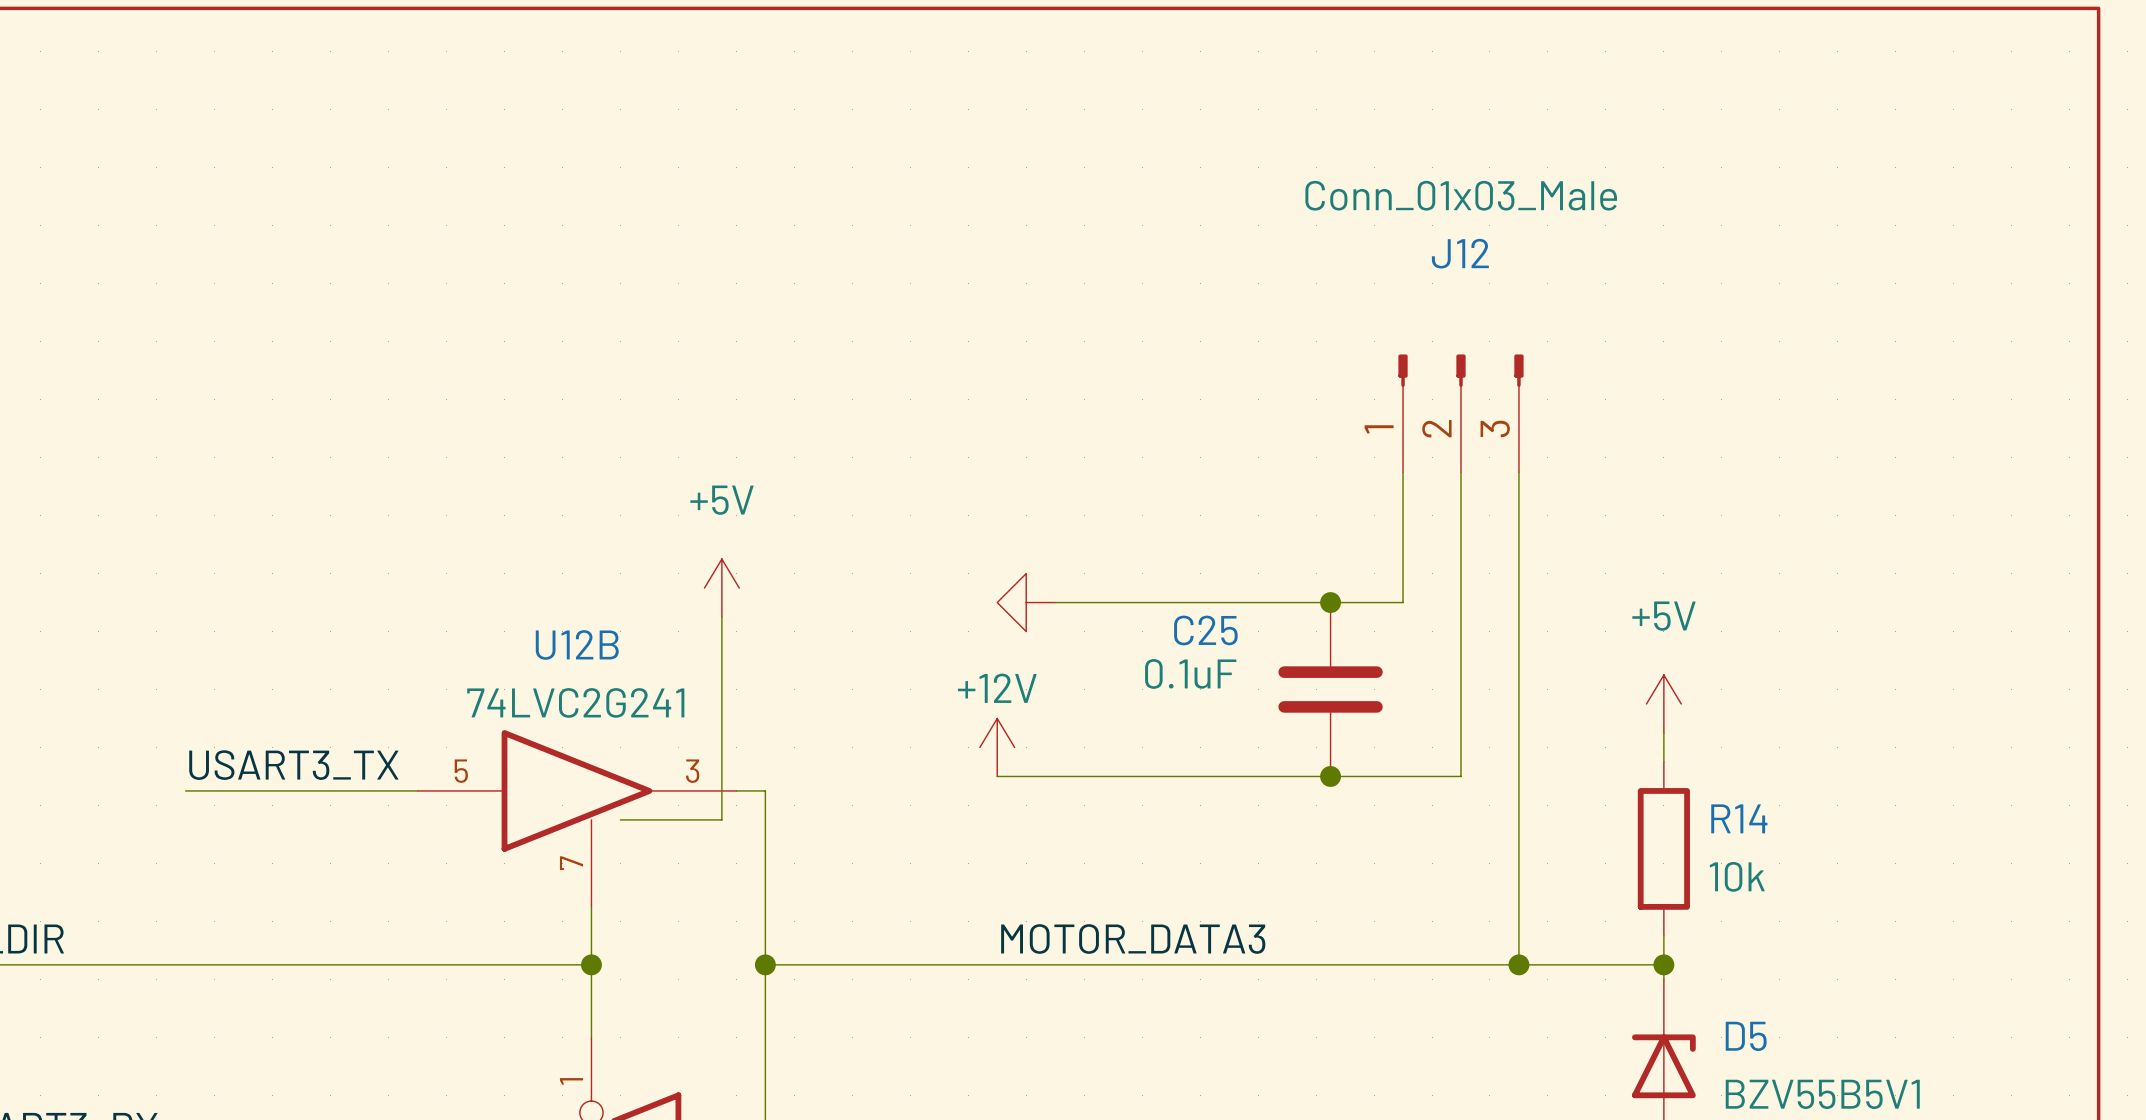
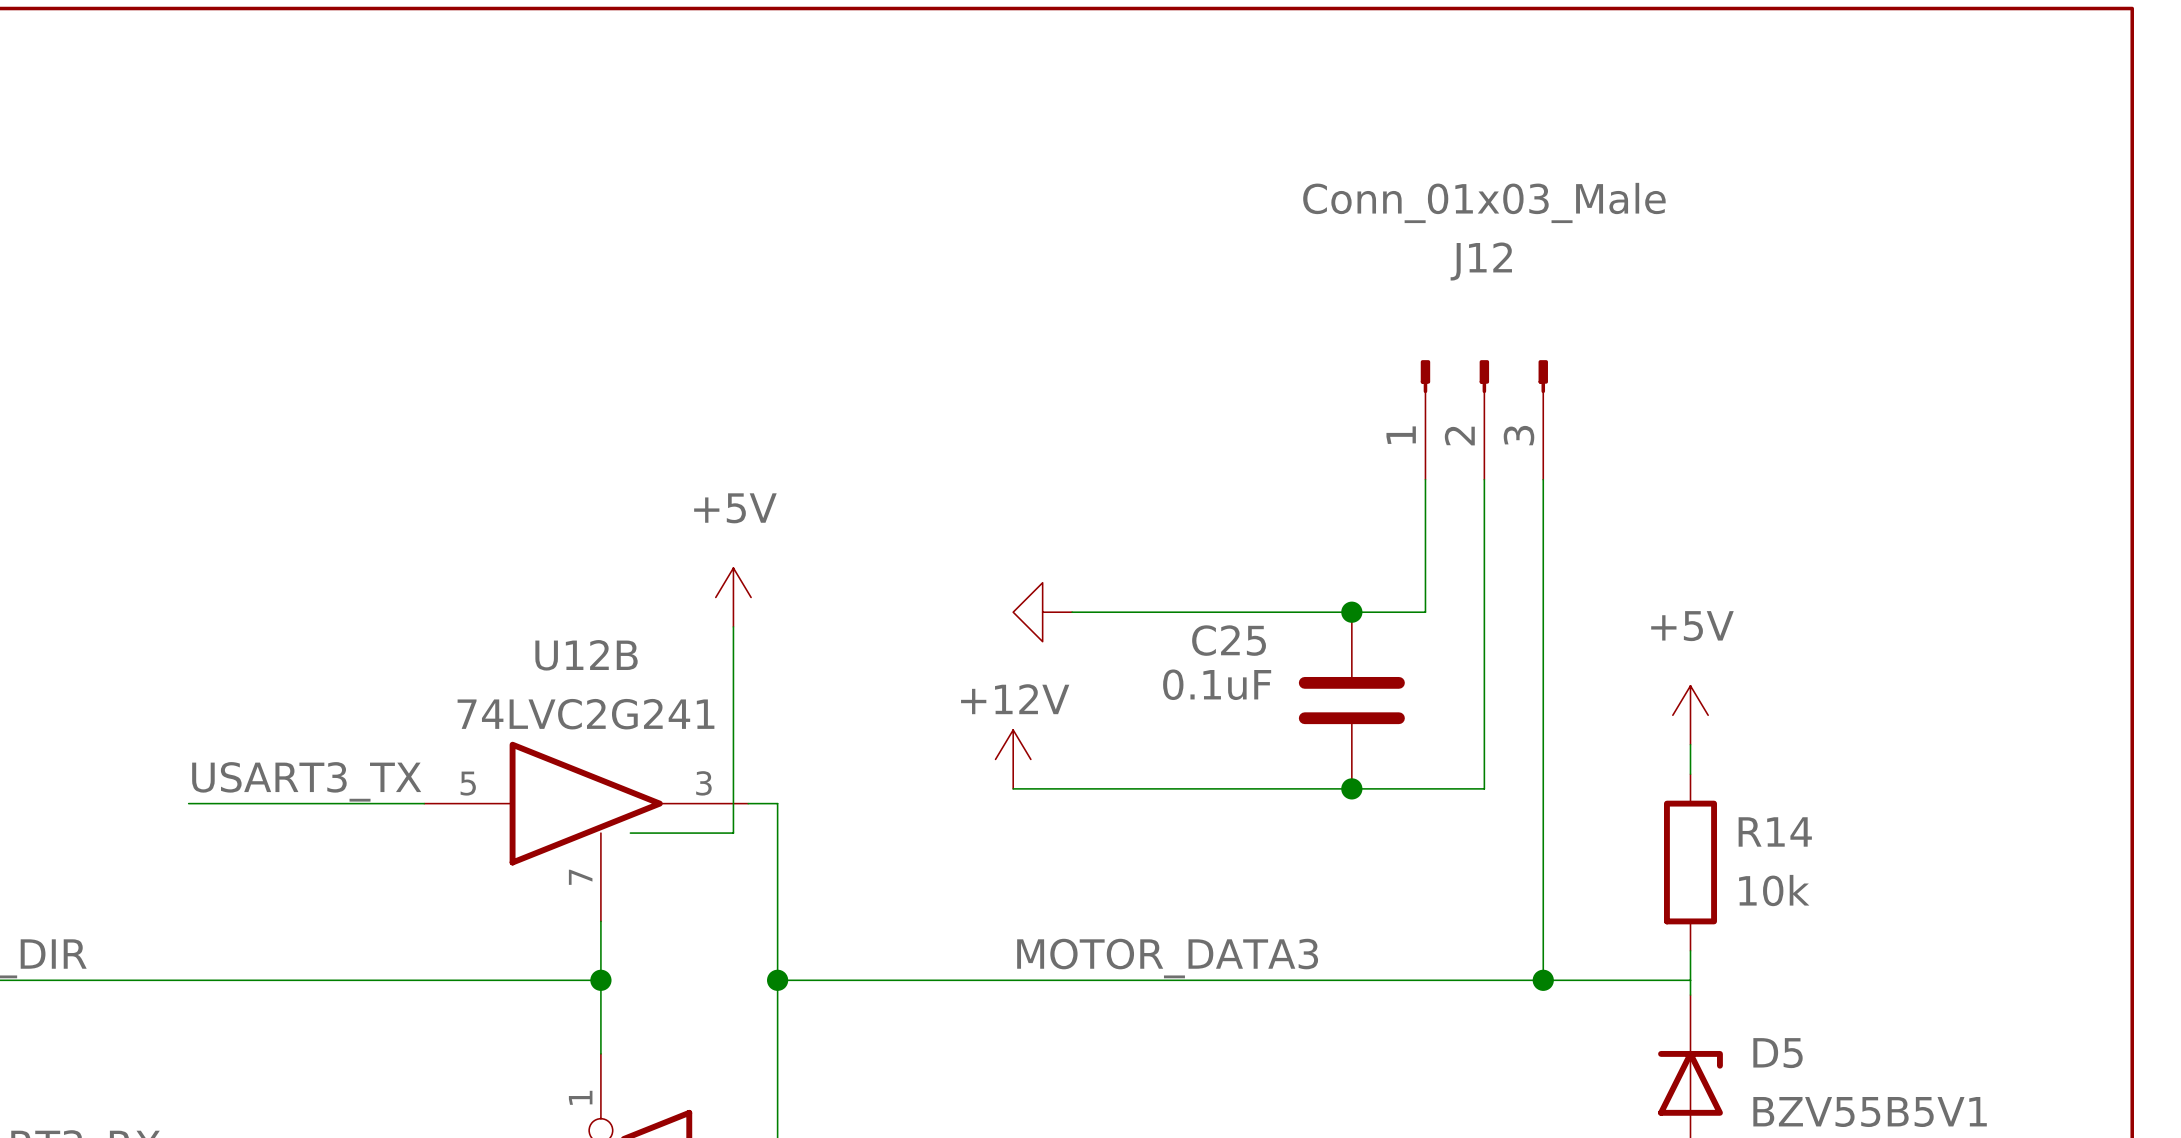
junction: (1663, 964) -> none

